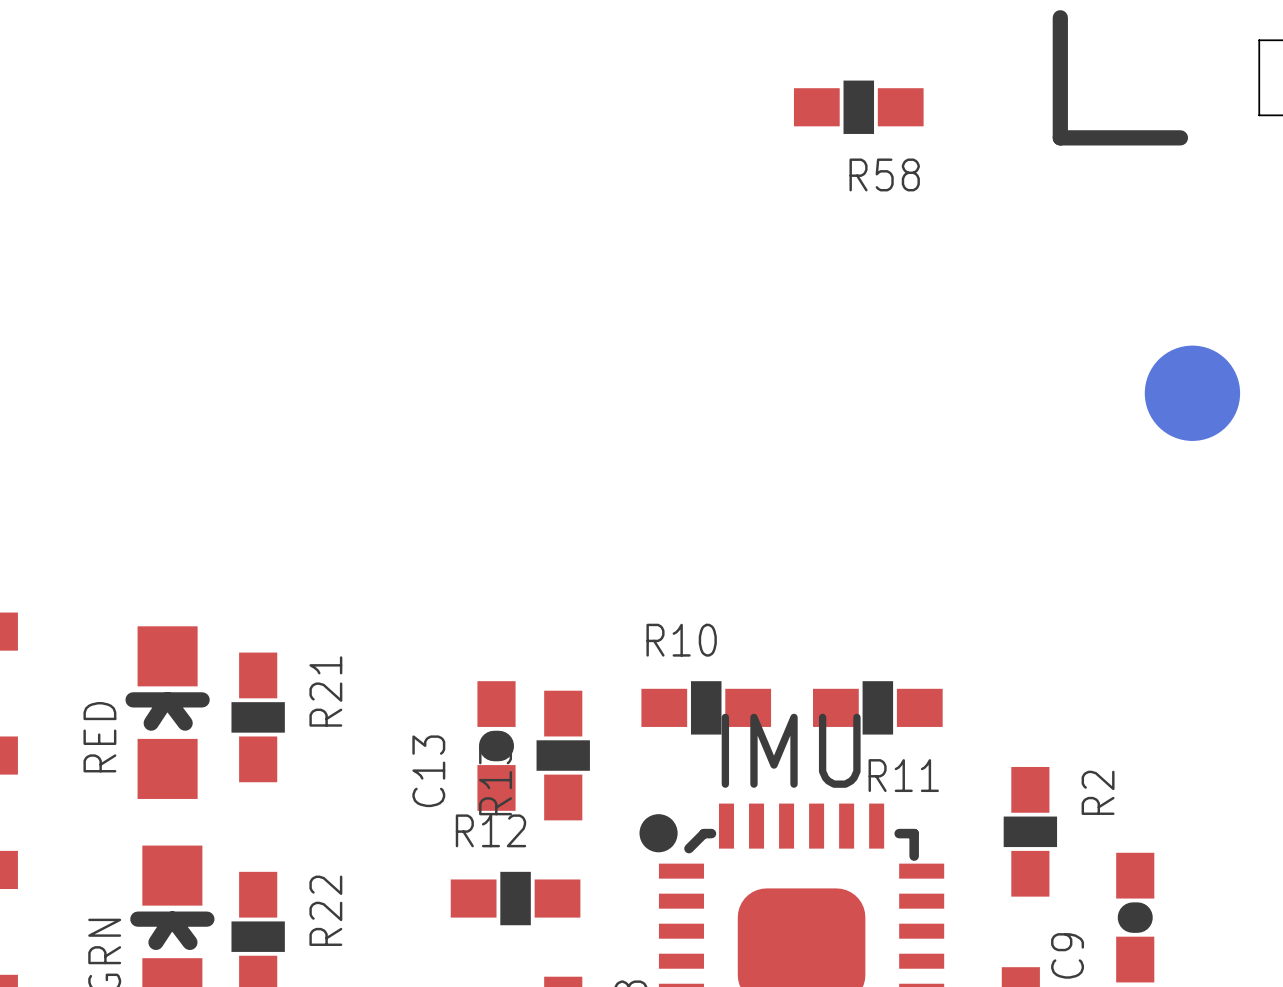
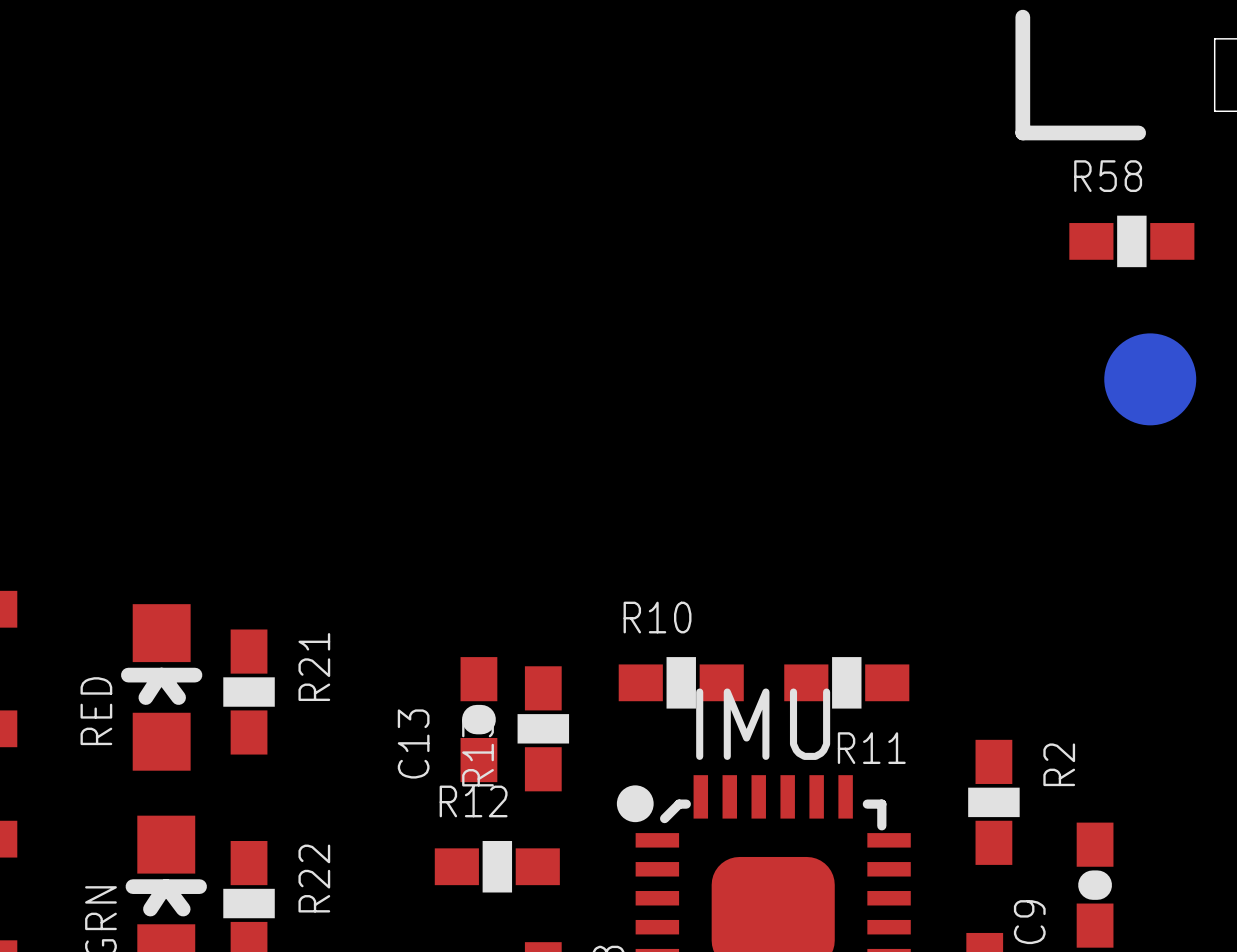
R58 position: (858, 107) -> (1131, 241)
R58 name position: R58 (884, 174) -> R58 (1108, 176)

